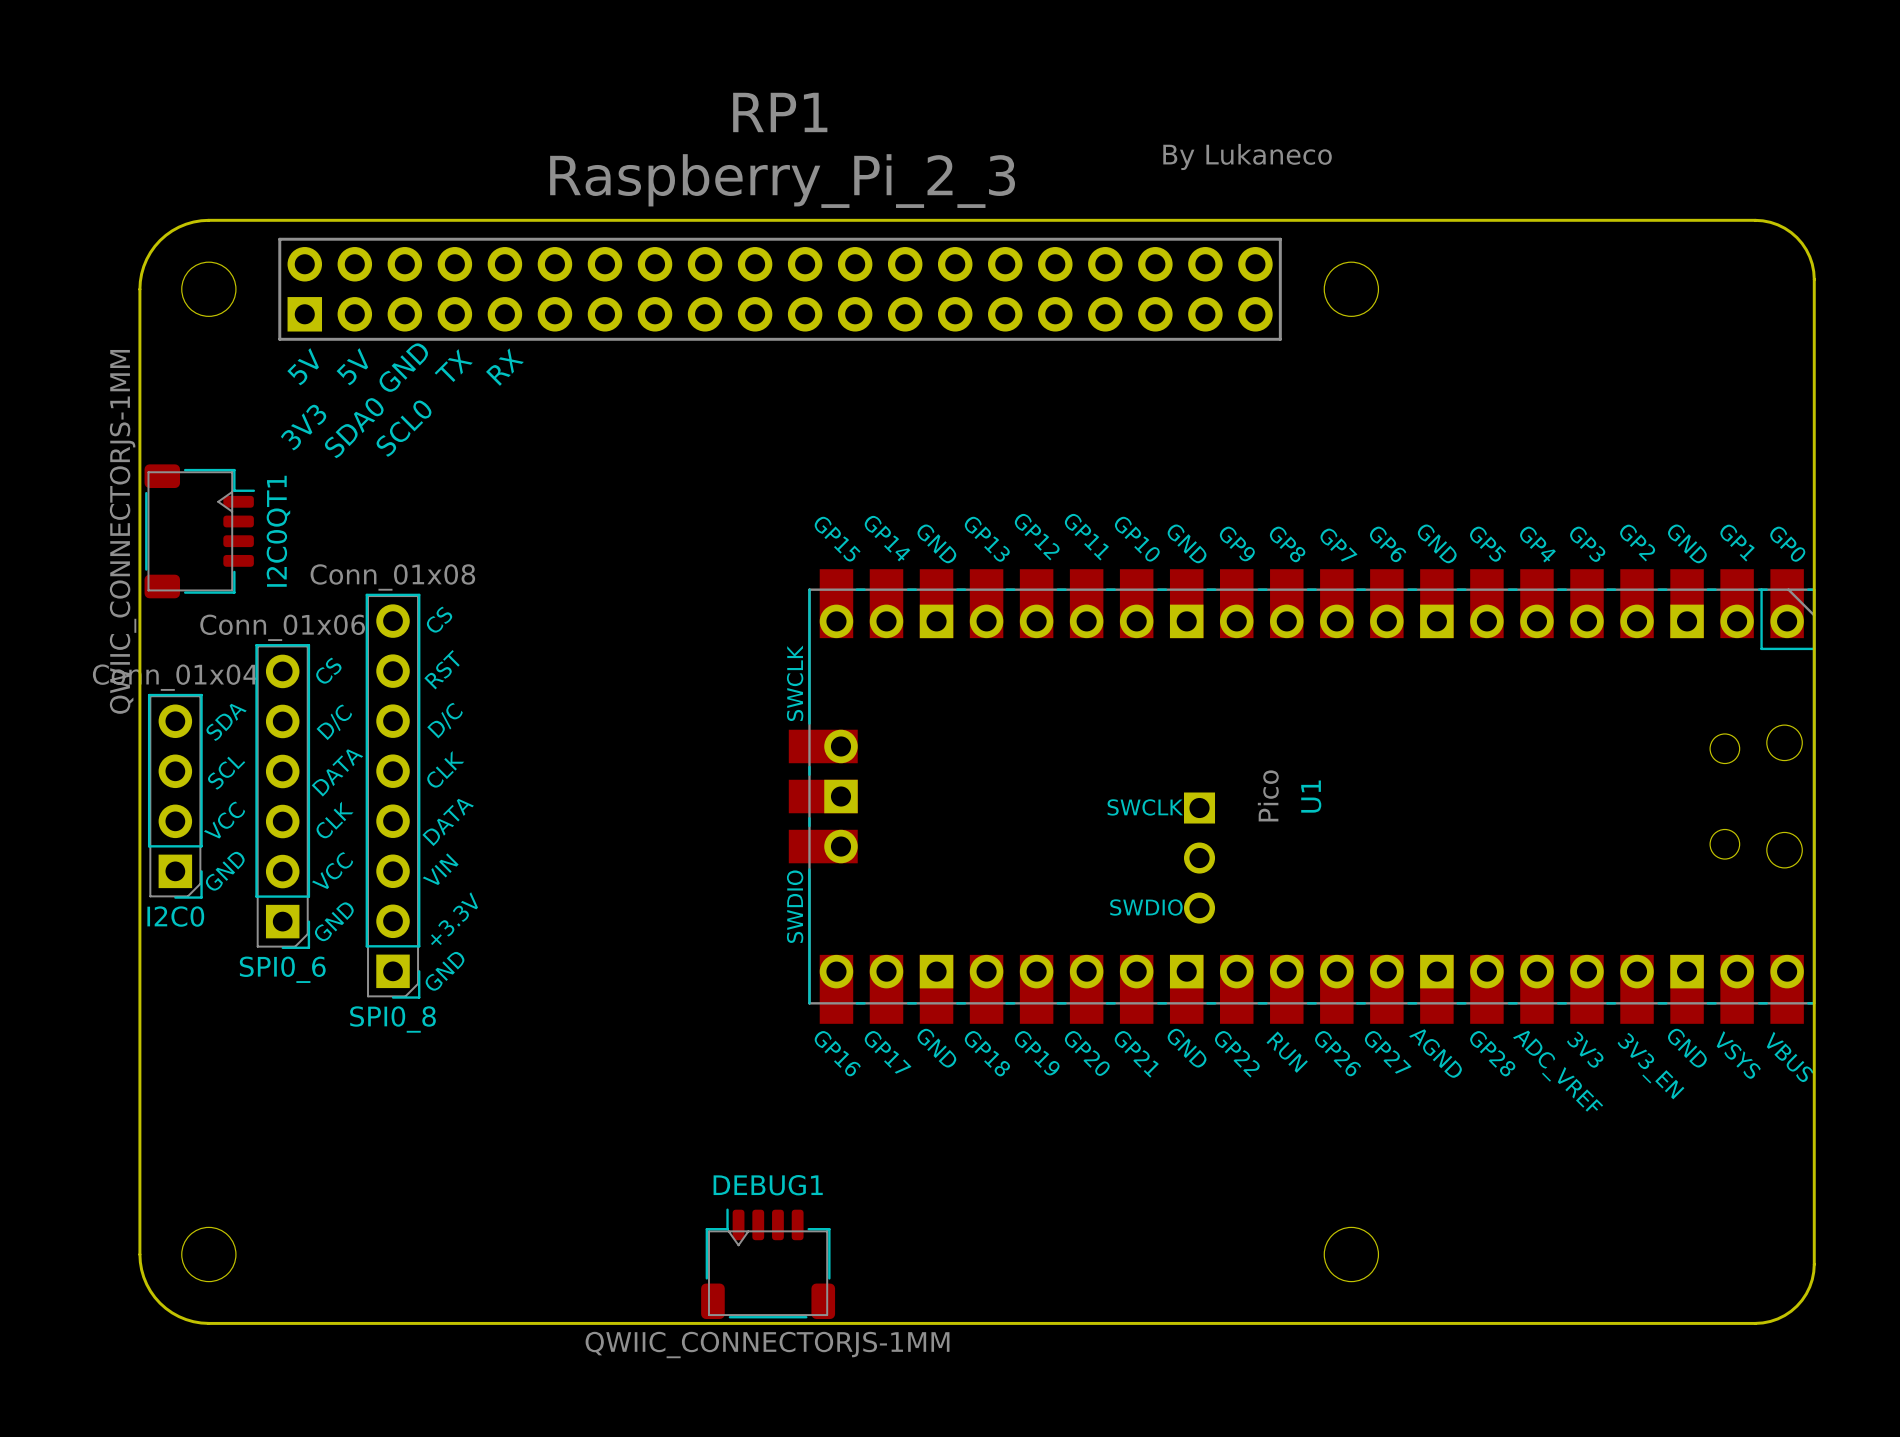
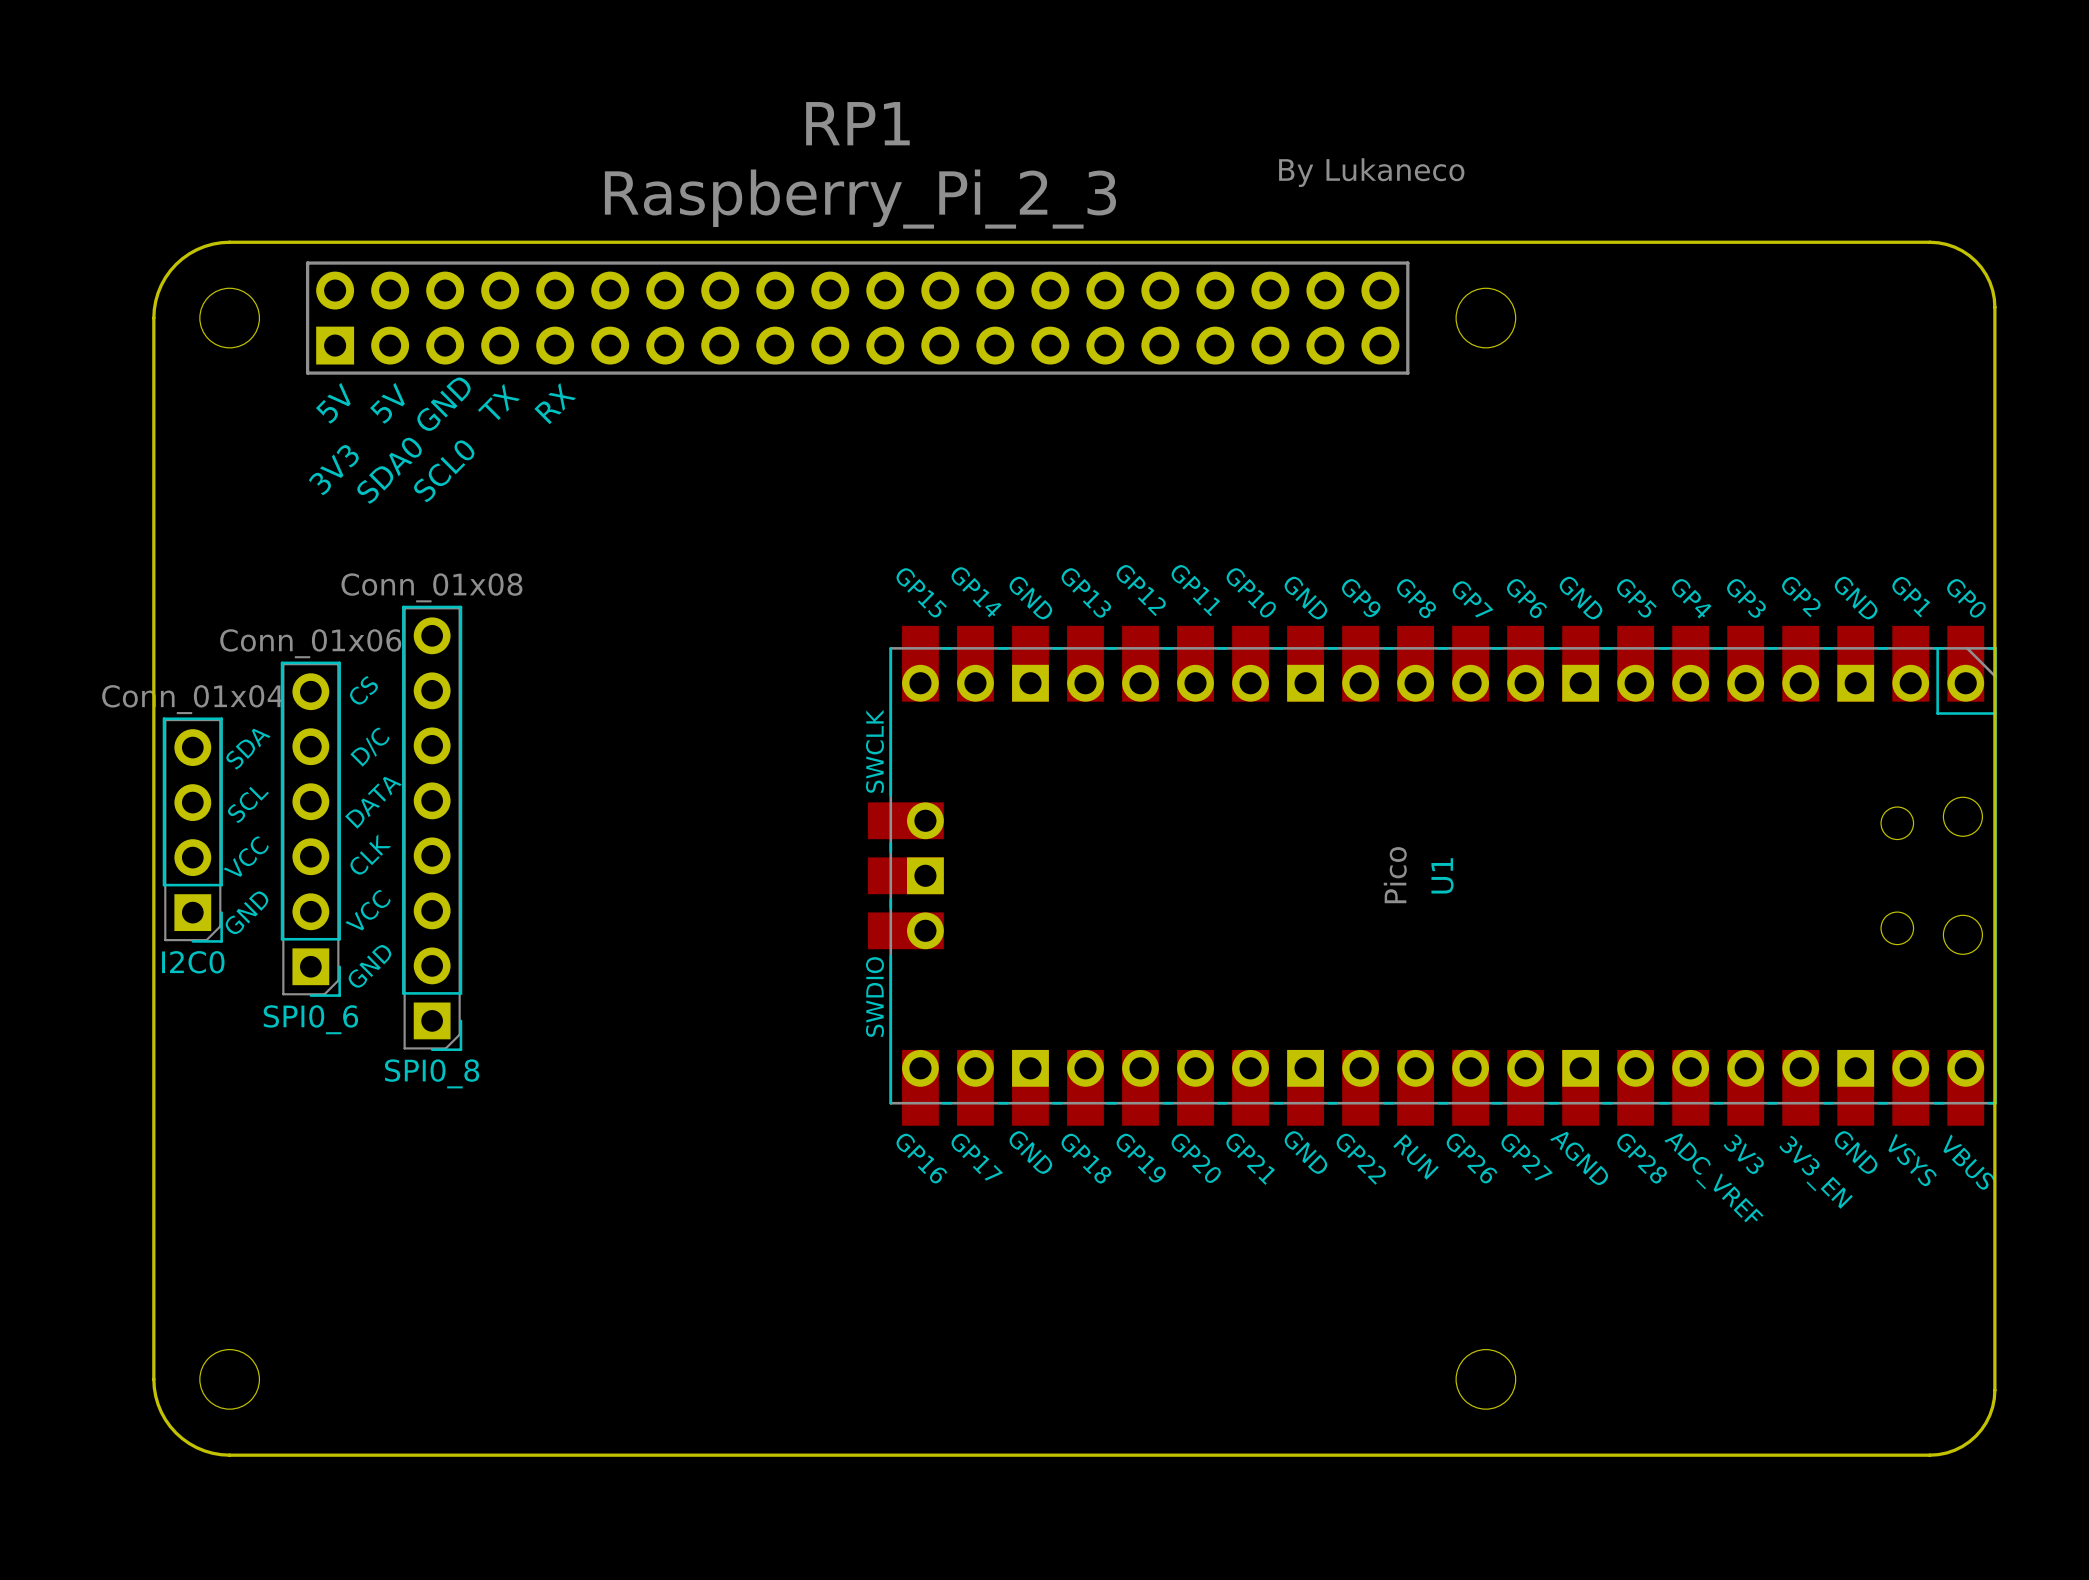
I2C0QT1: QWIIC_CONNECTORJS-1MM (199, 531) -> none
U1 footprint: [788, 569, 1816, 1024] -> [868, 625, 1997, 1126]
text: CS (439, 619) -> none
text: RST (442, 669) -> none
text position: CS (328, 670) -> CS (364, 690)
text: D/C (444, 720) -> none
text position: SDA (226, 722) -> SDA (248, 749)
text position: D/C (334, 722) -> D/C (369, 747)
text: CLK (445, 769) -> none
text position: DATA (337, 772) -> DATA (373, 802)
text position: SCL (226, 773) -> SCL (248, 804)
I2C0 position: (175, 796) -> (192, 830)
SPI0_6 position: (282, 796) -> (310, 829)
SPI0_8 position: (393, 796) -> (432, 828)
text position: CLK (335, 819) -> CLK (370, 854)
text position: VCC (224, 820) -> VCC (246, 856)
text: DATA (448, 822) -> none
text: VIN (440, 869) -> none
text position: VCC (332, 870) -> VCC (368, 910)
text position: GND (225, 871) -> GND (247, 912)
text: +3.3V (454, 918) -> none
text position: GND (334, 921) -> GND (370, 966)
text: GND (445, 971) -> none
DEBUG1: QWIIC_CONNECTORJS-1MM (768, 1263) -> none

